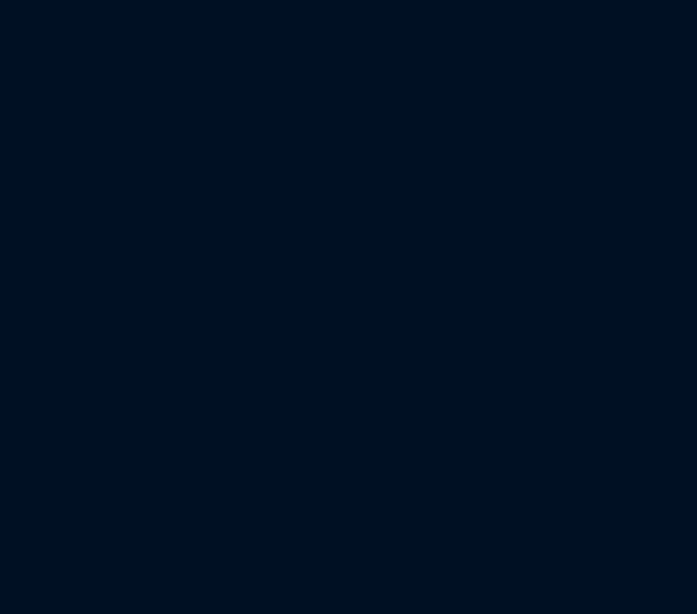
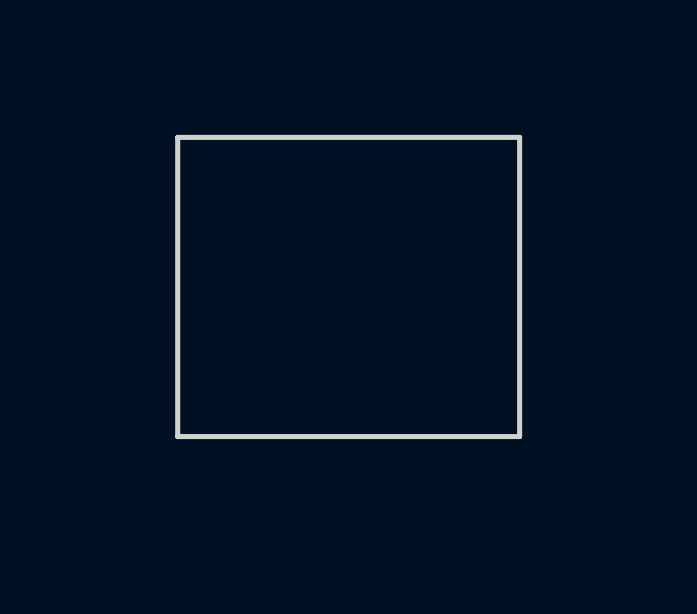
board edge: none -> (177, 137) (177, 436) (519, 436) (519, 137) (177, 137)

